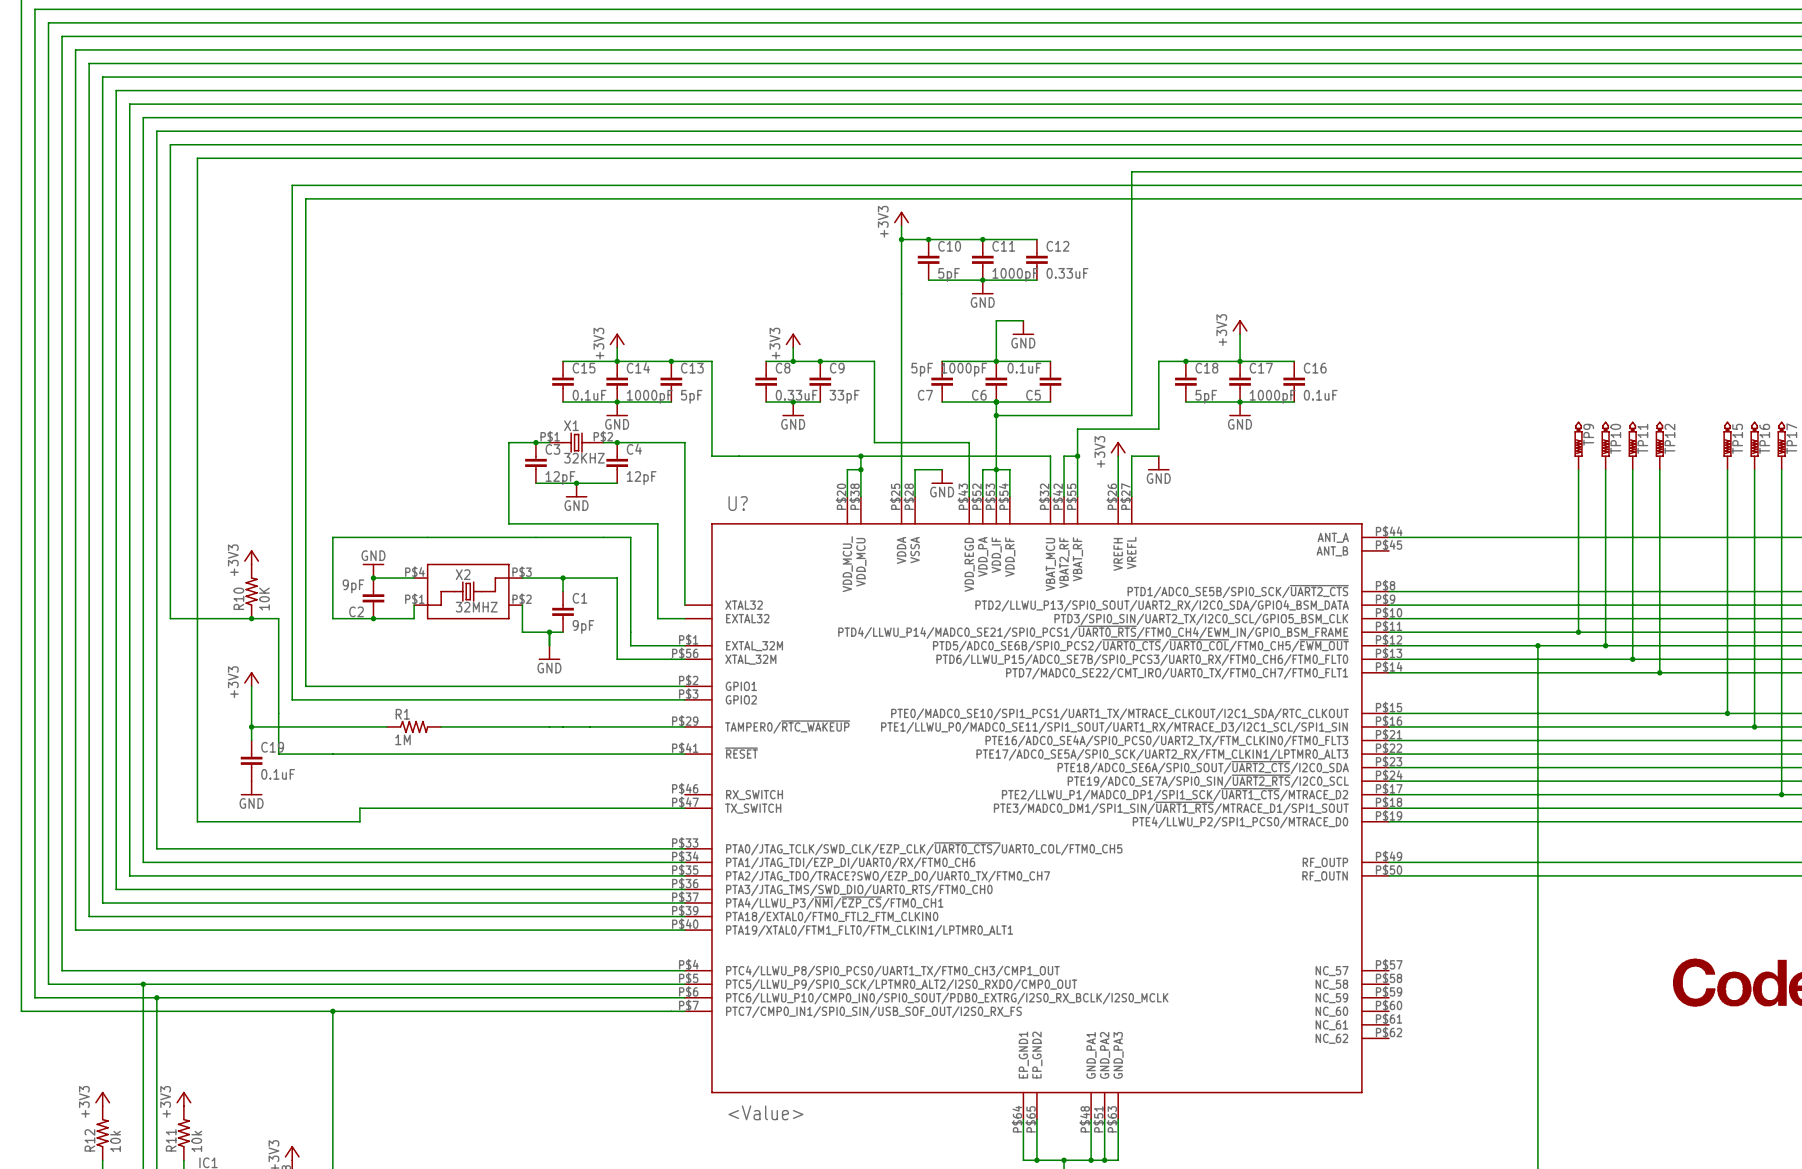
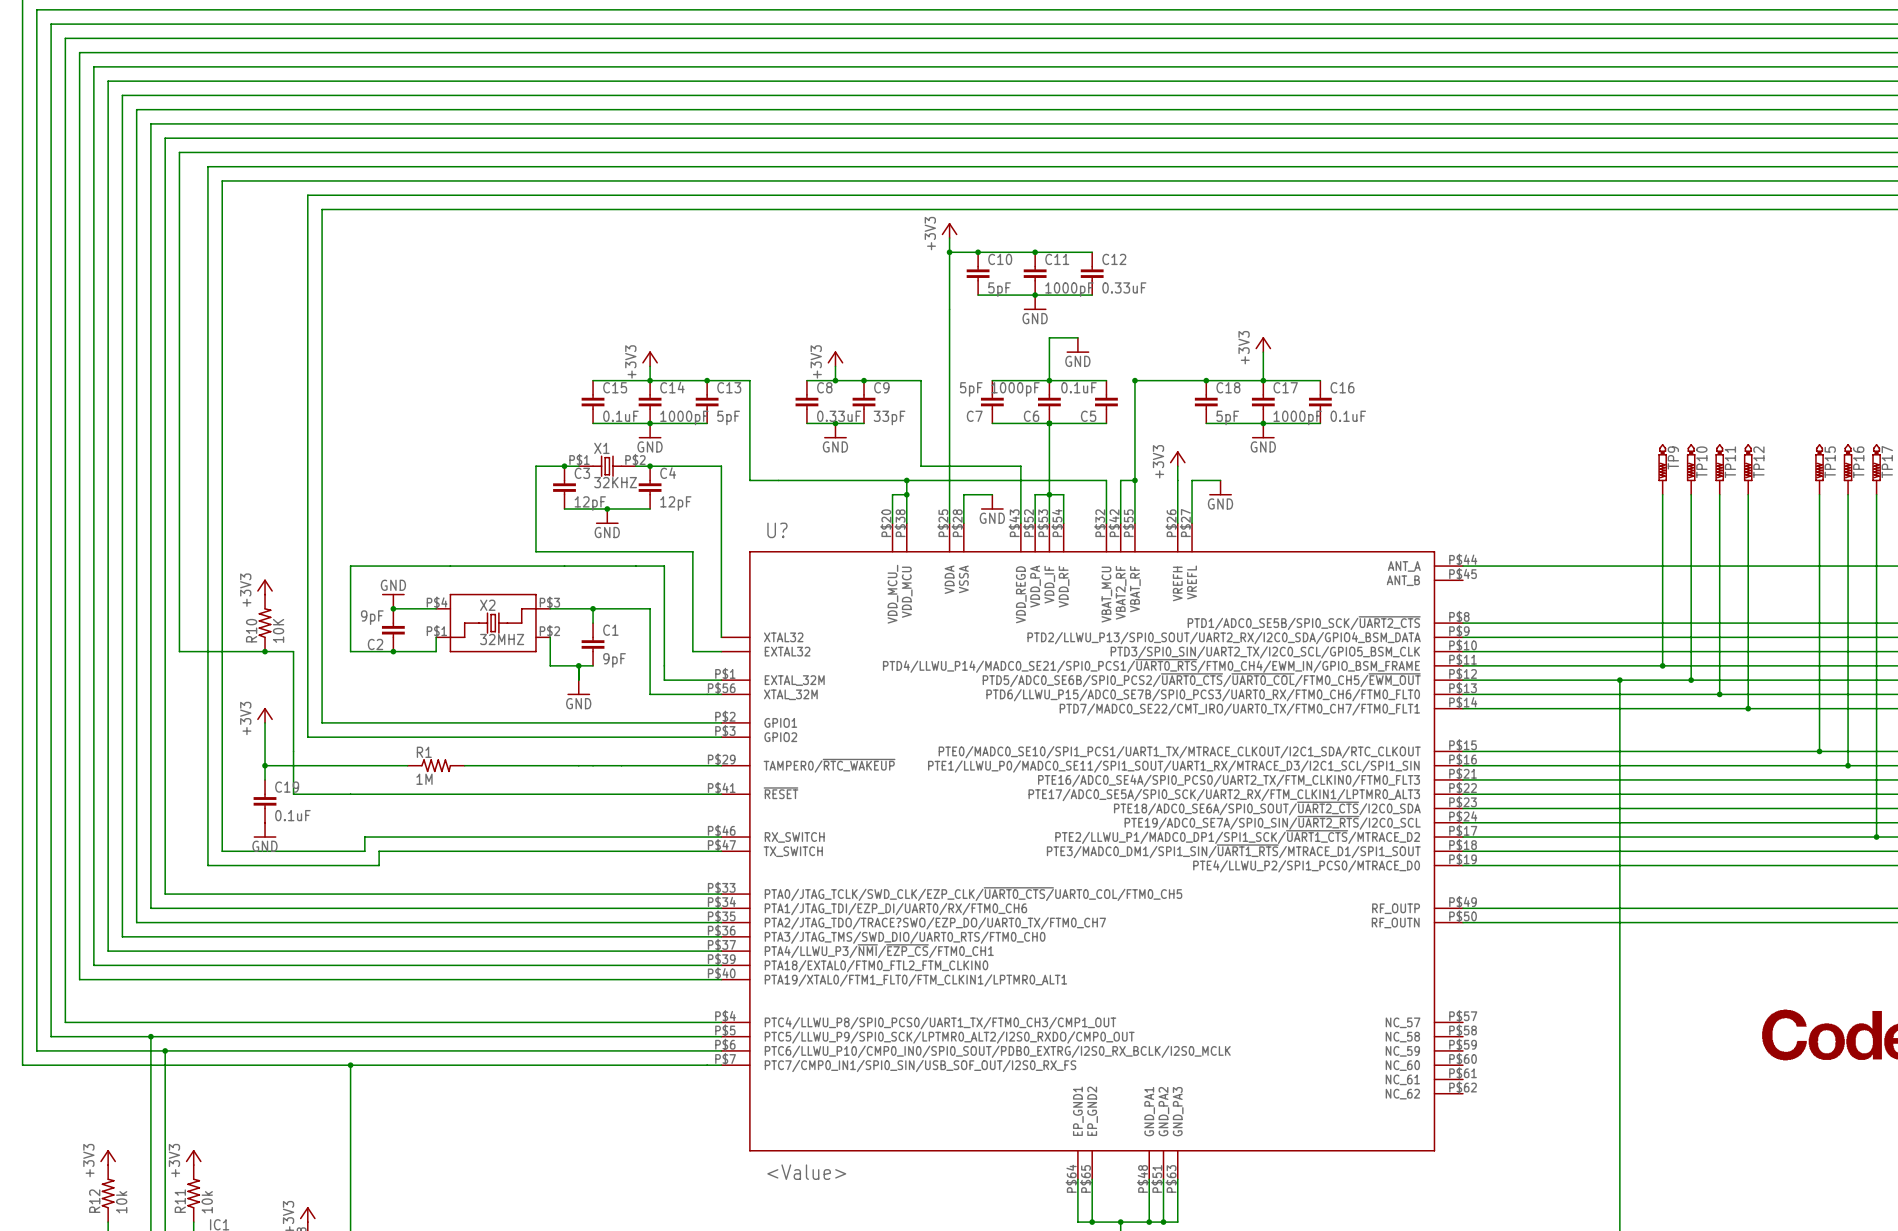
wire: (1131, 171) (1131, 415) (996, 415) -> (1192, 180) (222, 180) (222, 851) (364, 851) (364, 837) (721, 837)
power symbol position: +3V3 (1240, 327) -> +3V3 (1263, 344)
wire: (1240, 334) (1240, 361) -> (1263, 352) (1263, 380)
junction: none -> (1134, 380)
junction: none -> (1206, 380)
wire: (1158, 361) (1158, 429) (1077, 429) -> (1220, 380) (1134, 380) (1134, 451)
junction position: (1185, 361) -> (1263, 380)
junction: (1240, 361) -> none
wire: (1253, 361) (1294, 361) -> none
C18 position: (1185, 381) -> (1206, 402)
C17 position: (1240, 381) -> (1263, 402)
C16 position: (1294, 381) -> (1320, 402)
junction: none -> (1263, 423)
junction: (1240, 402) -> none
wire: (1253, 402) (1294, 402) -> (1206, 423) (1249, 423)
power symbol position: GND (1240, 409) -> GND (1263, 430)
junction: (996, 415) -> none
power symbol position: +3V3 (1118, 449) -> +3V3 (1177, 458)

